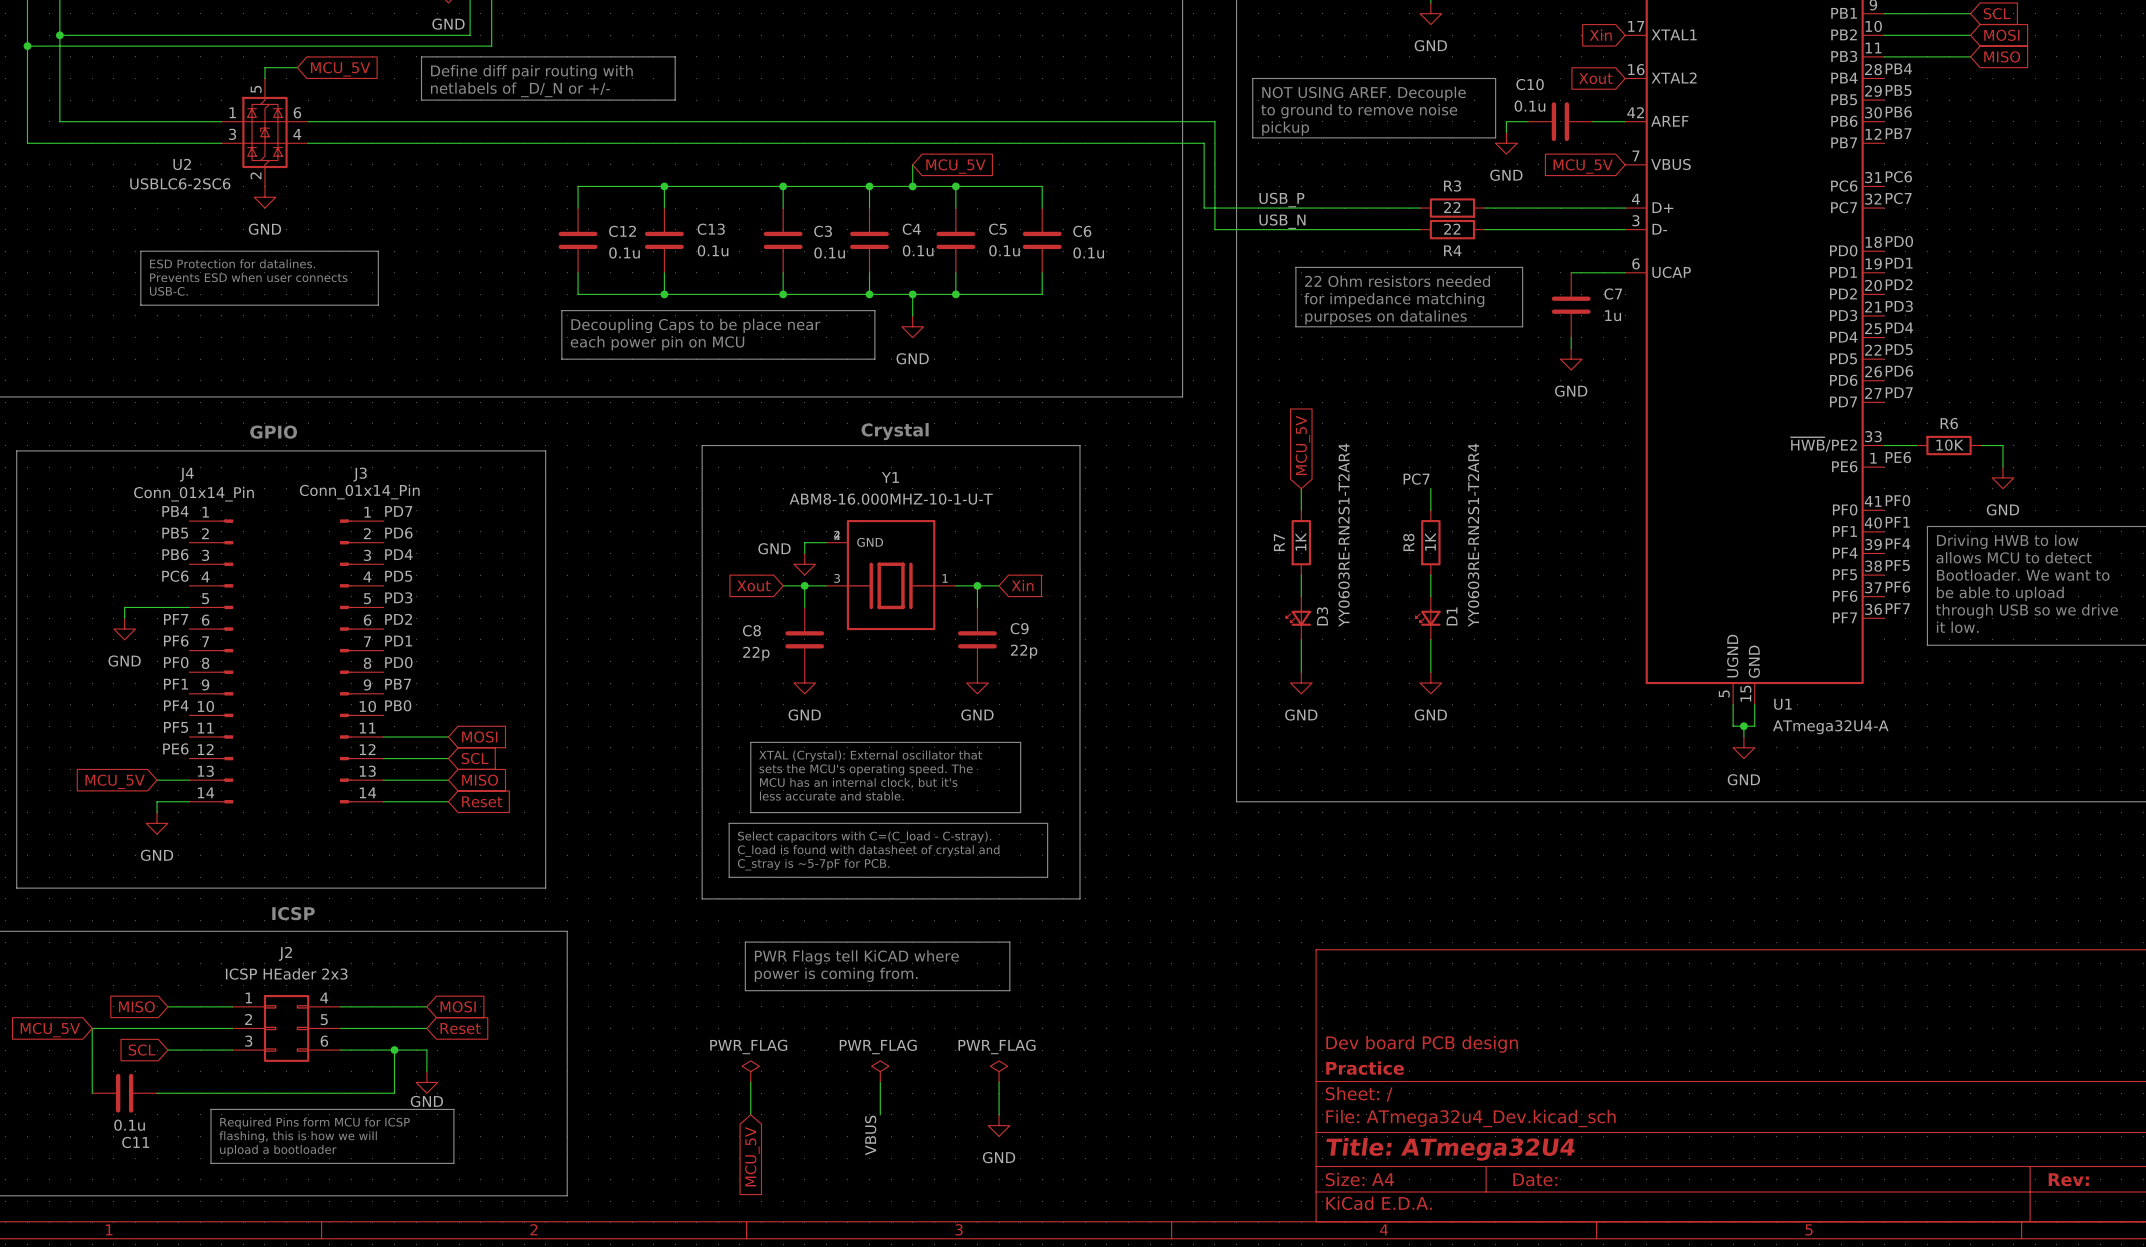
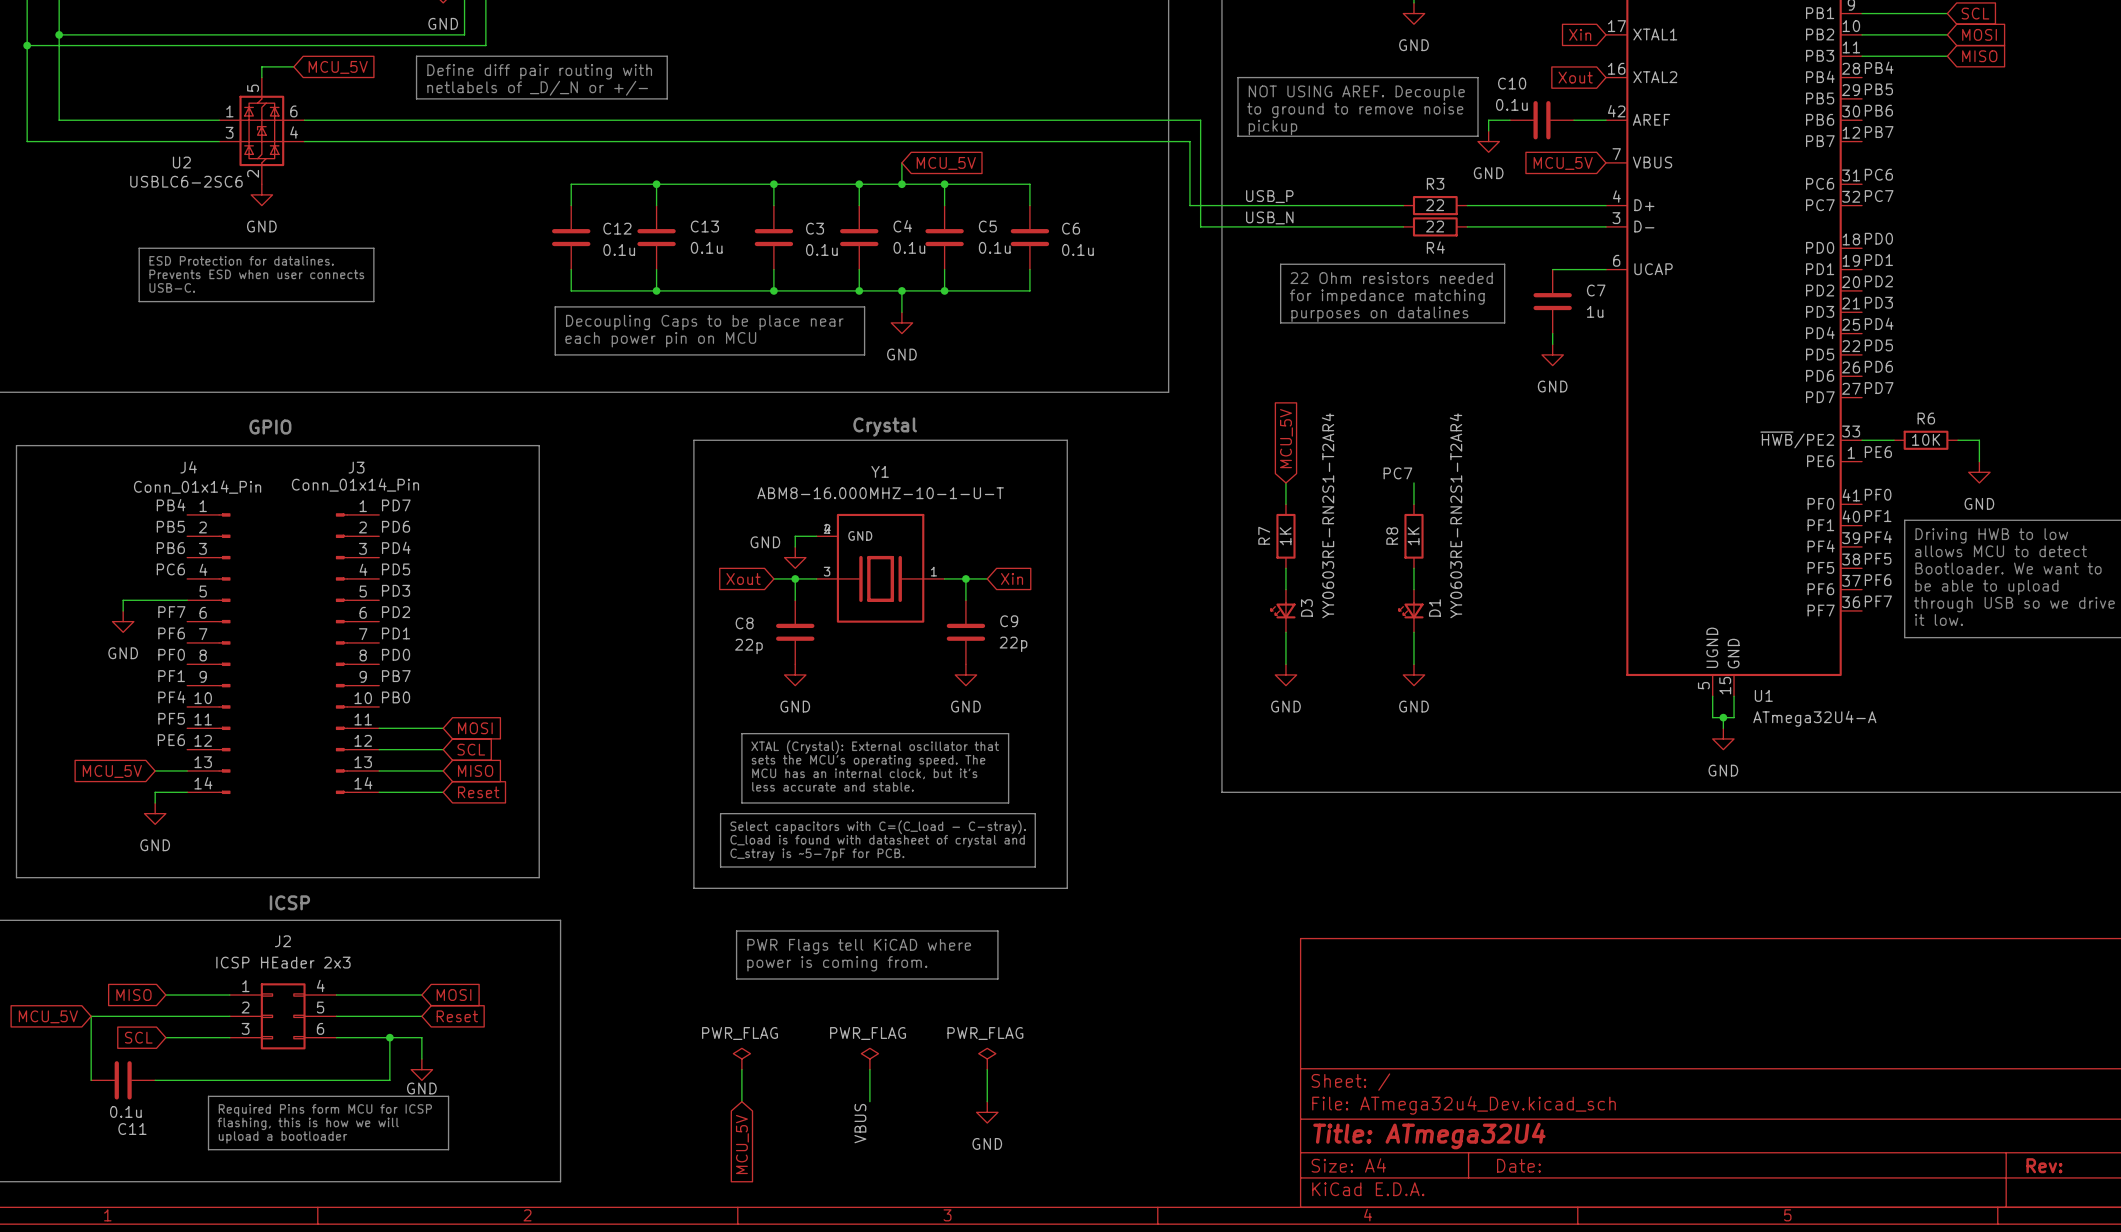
title block: Dev board PCB design (1422, 1044) -> none
title block: Practice (1365, 1068) -> none

